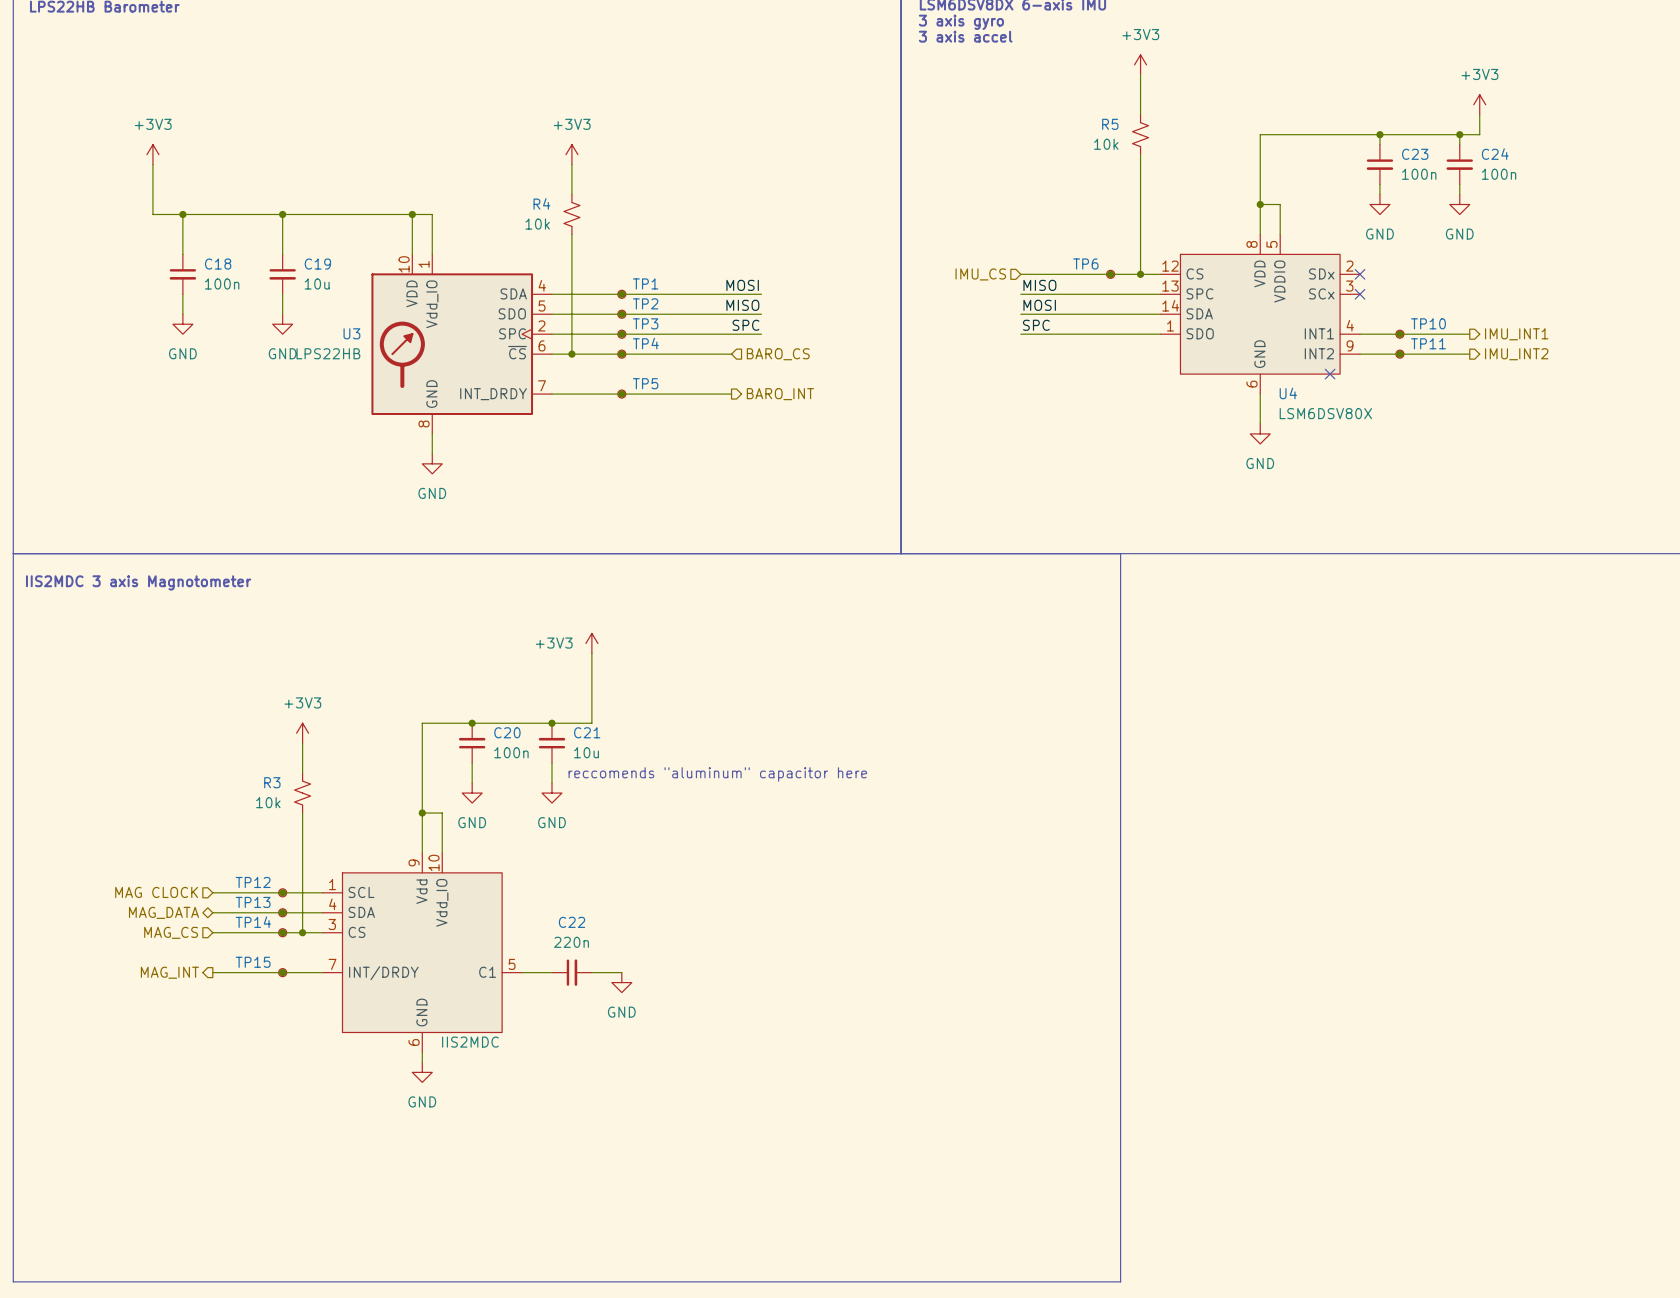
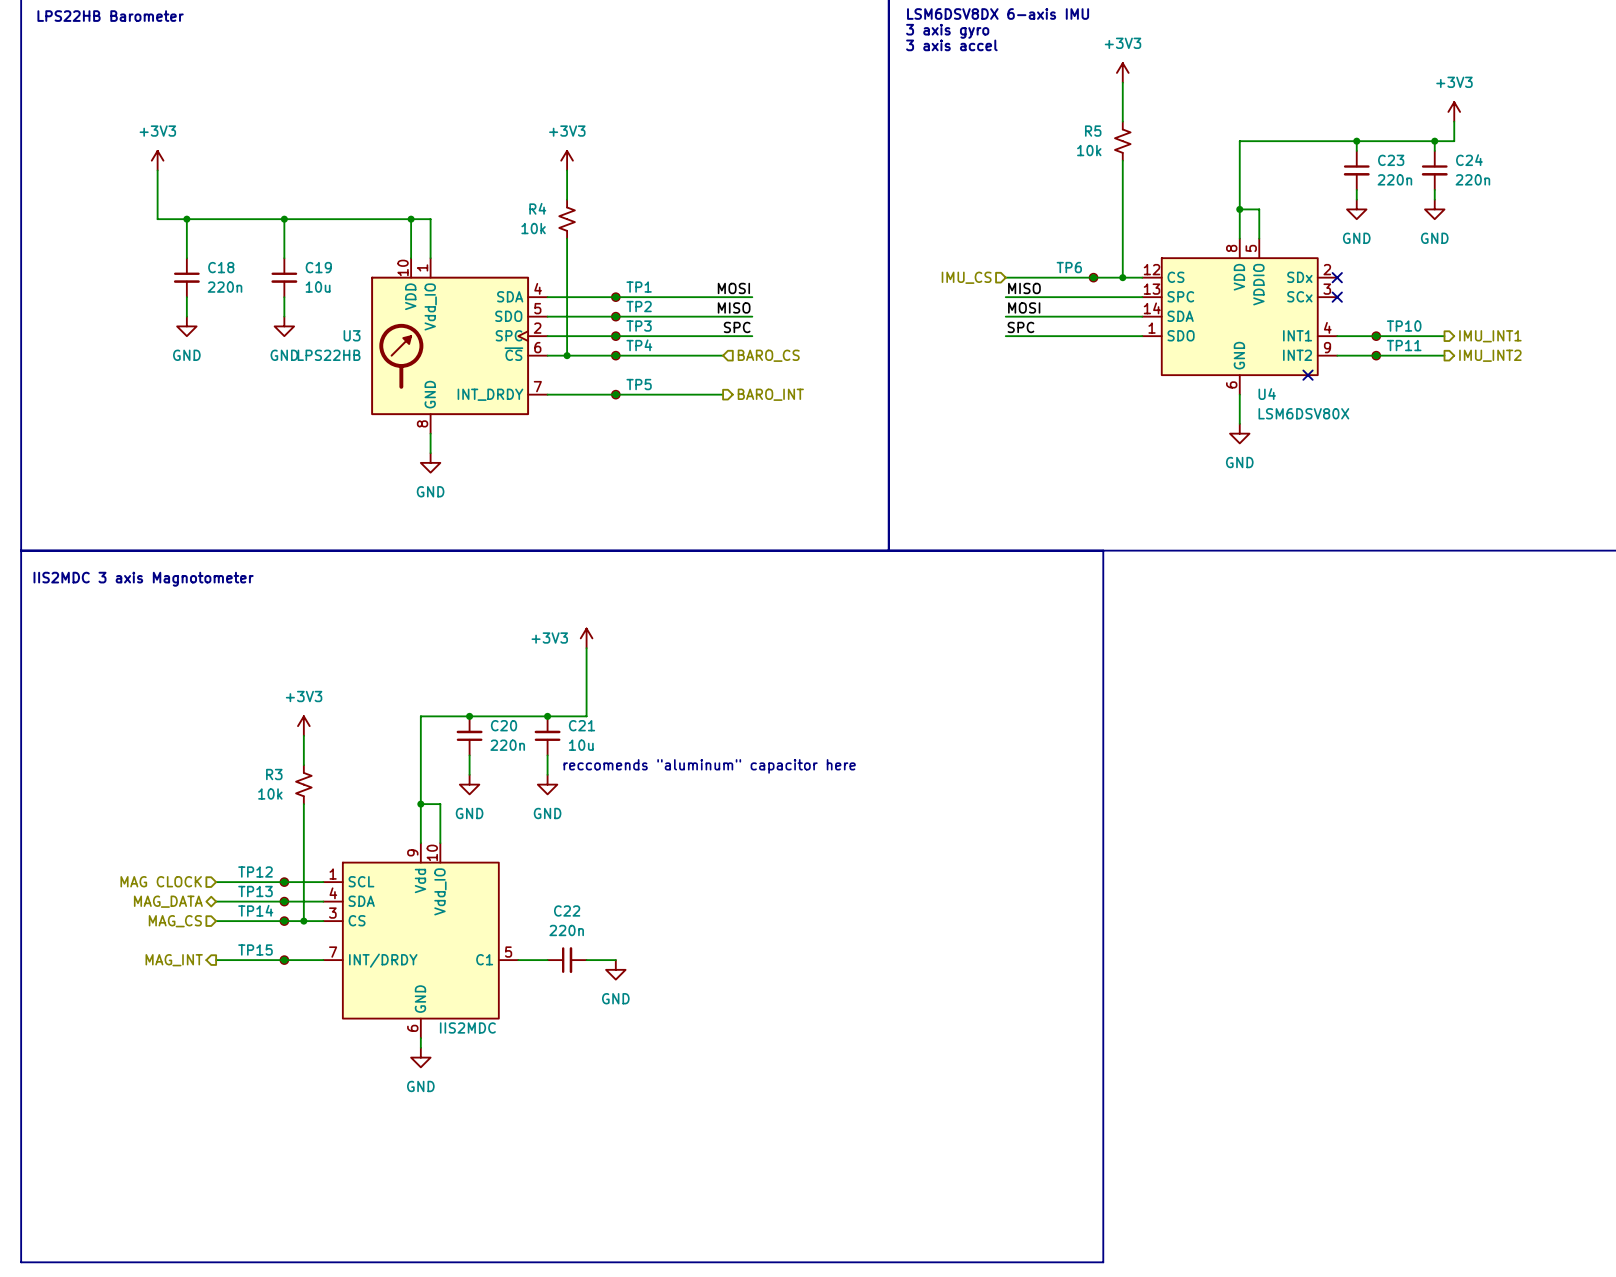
C23 value: 100n (1419, 174) -> 220n (1394, 179)
C24 value: 100n (1499, 174) -> 220n (1472, 179)
C18 value: 100n (222, 283) -> 220n (225, 287)
C20 value: 100n (511, 752) -> 220n (507, 745)

